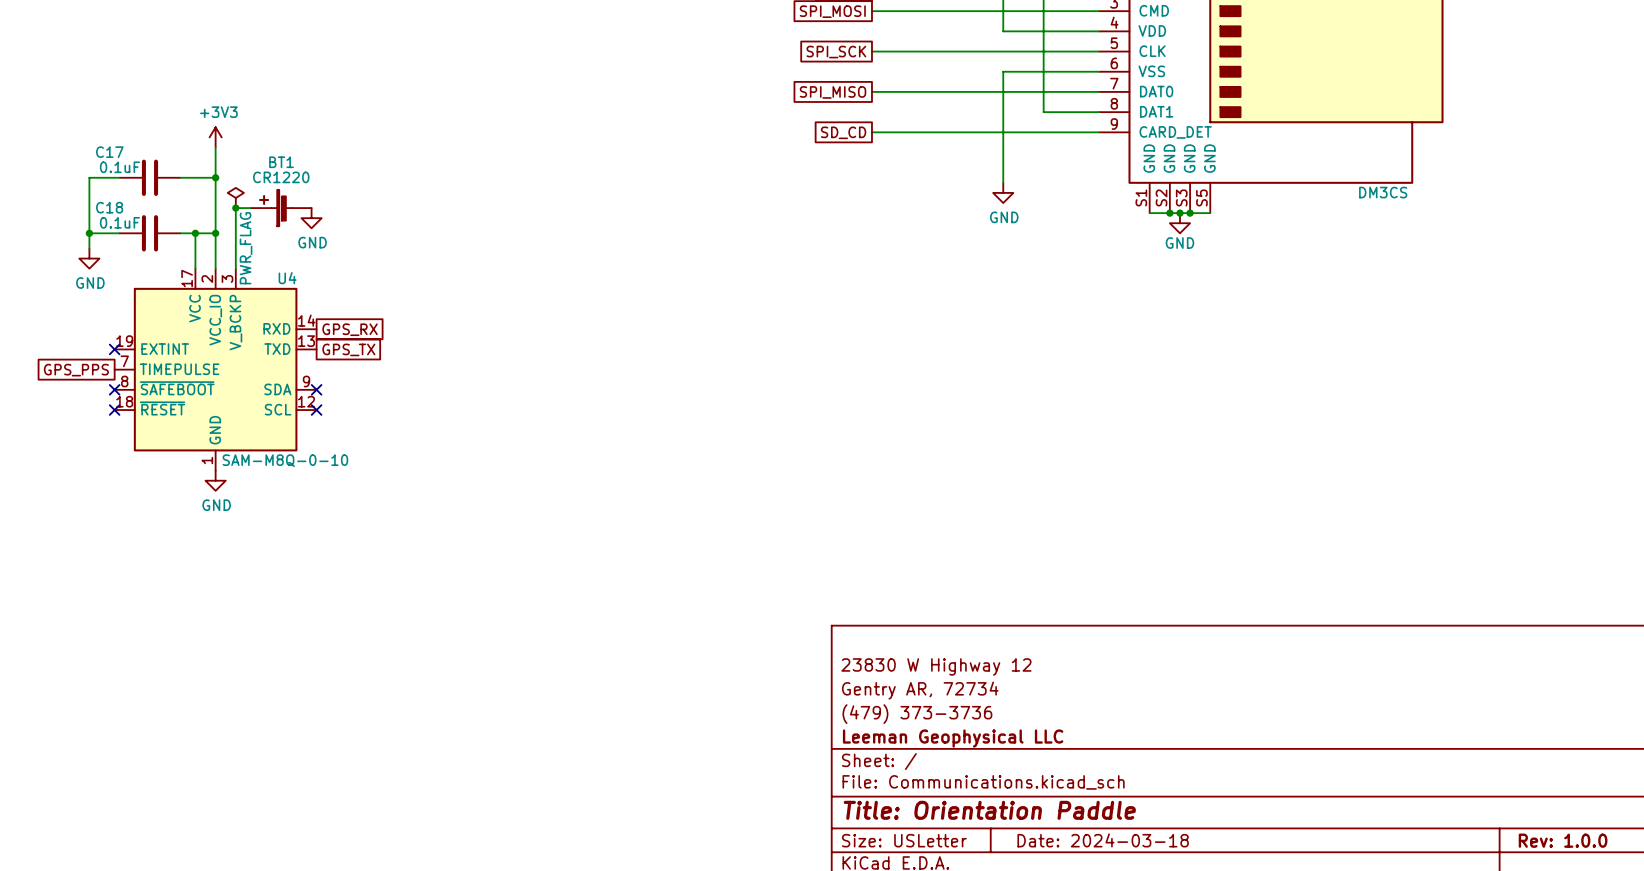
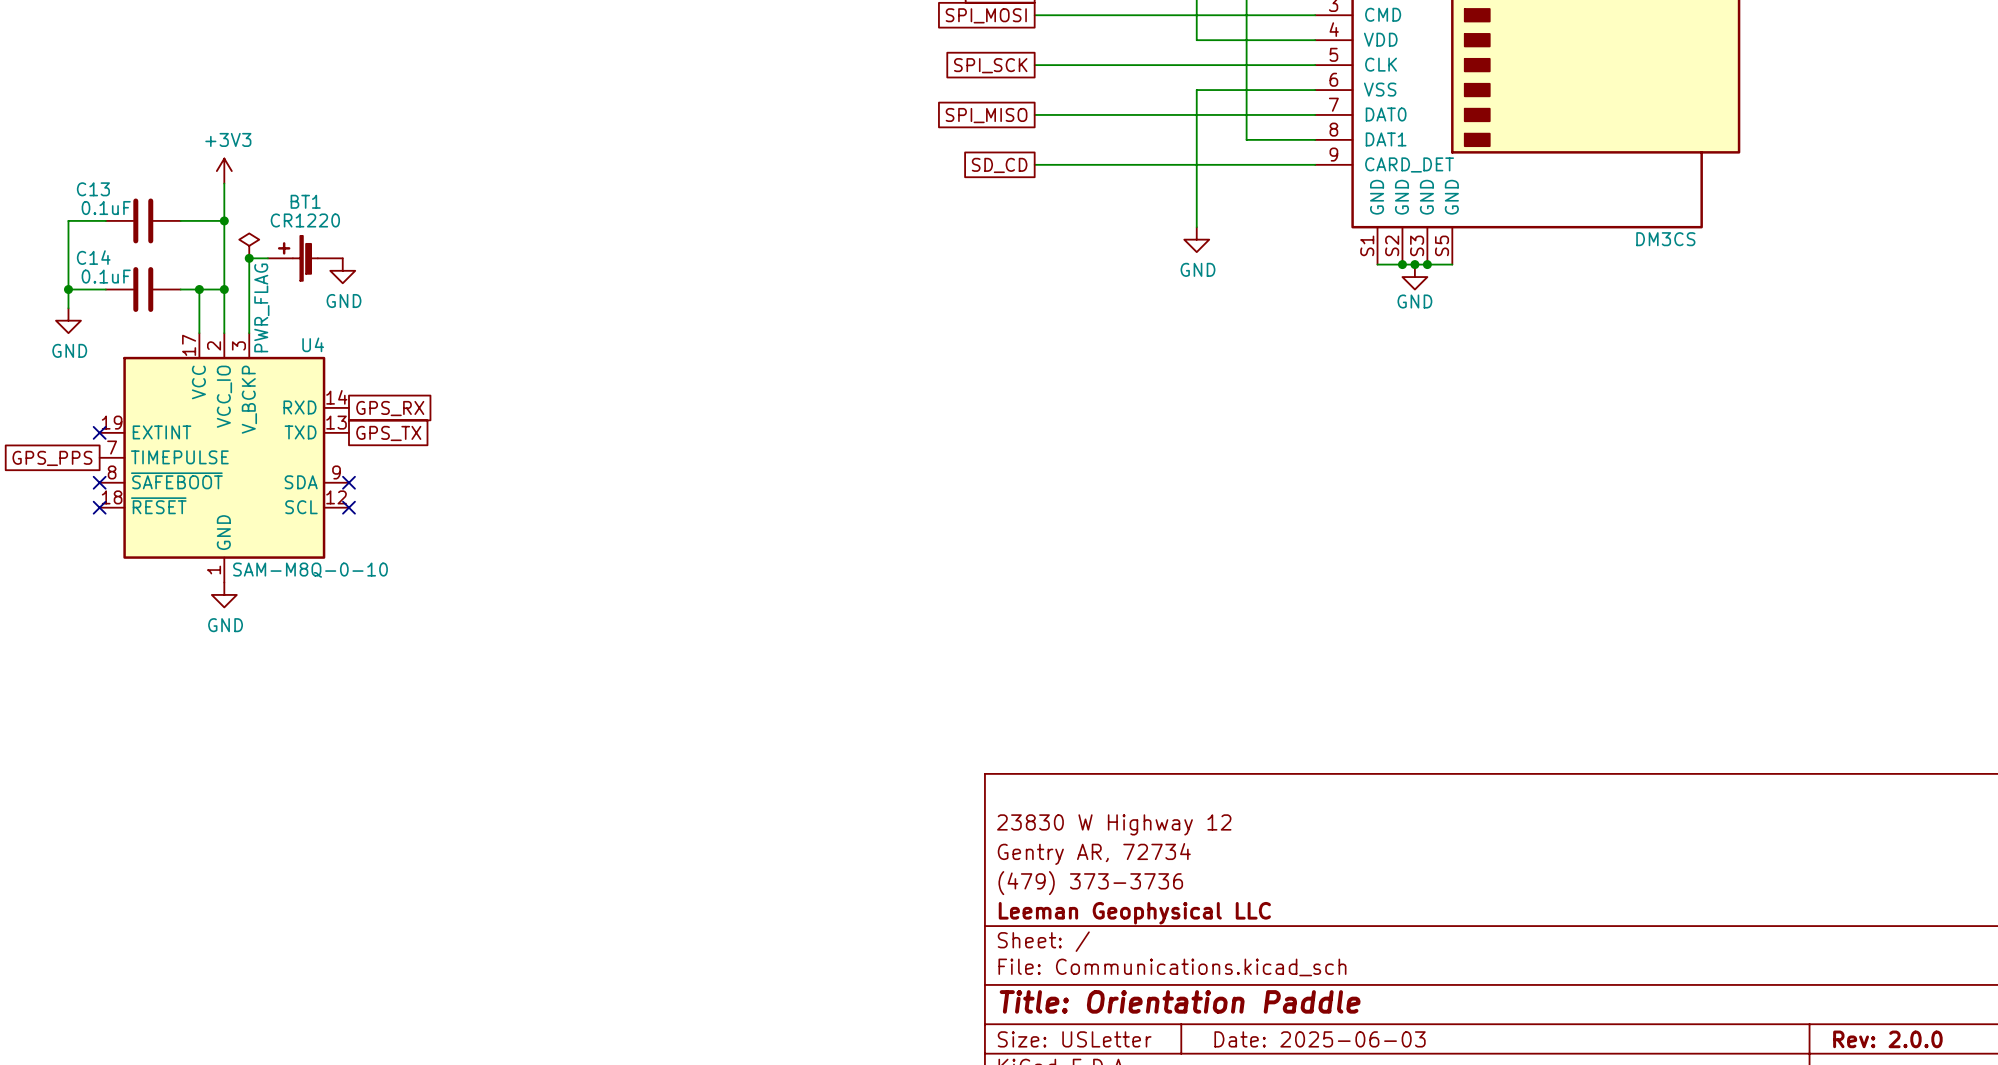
C17 name: C17 (109, 152) -> C13 (93, 189)
C18 name: C18 (109, 207) -> C14 (93, 257)
title block: Date: 2024-03-18 (1103, 840) -> Date: 2025-06-03 (1320, 1039)
title block: Rev: 1.0.0 (1563, 840) -> Rev: 2.0.0 (1887, 1039)

